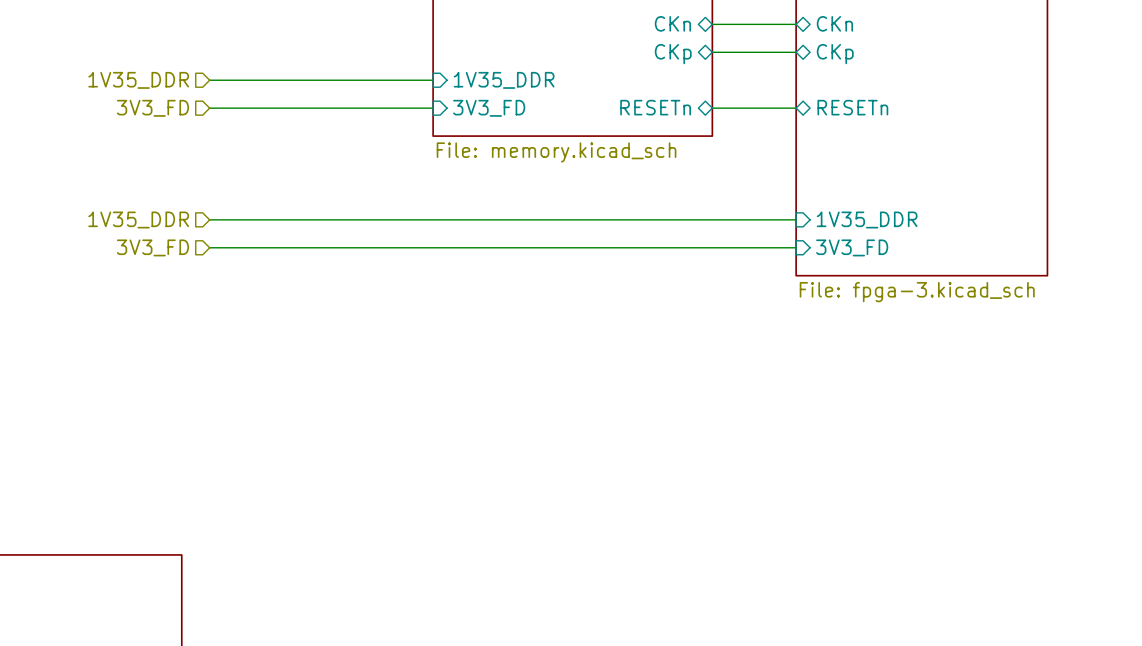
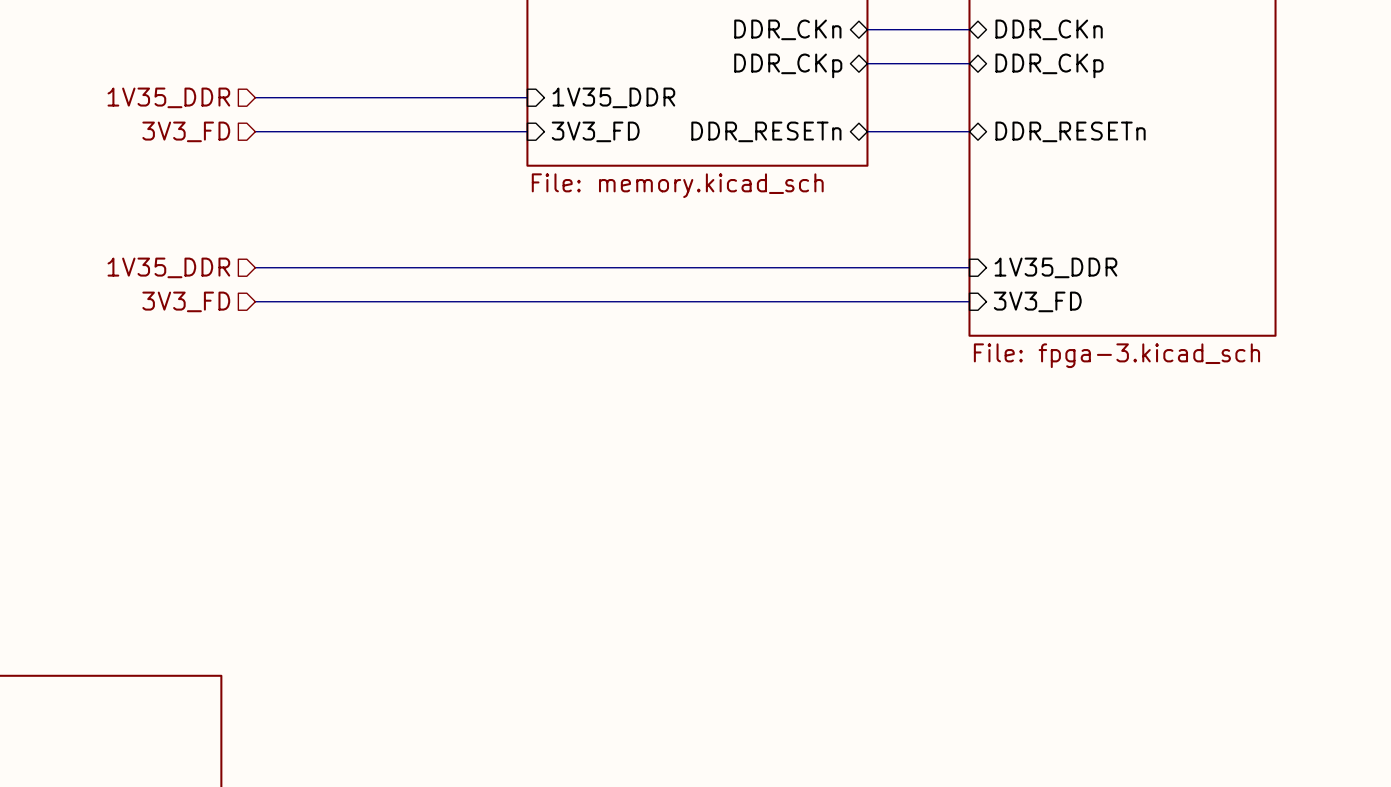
sheet pin: CKn (672, 23) -> DDR_CKn (787, 29)
sheet pin: CKn (834, 23) -> DDR_CKn (1049, 29)
sheet pin: CKp (673, 54) -> DDR_CKp (788, 65)
sheet pin: CKp (835, 54) -> DDR_CKp (1049, 65)
sheet pin: RESETn (655, 107) -> DDR_RESETn (766, 131)
sheet pin: RESETn (852, 107) -> DDR_RESETn (1070, 131)

